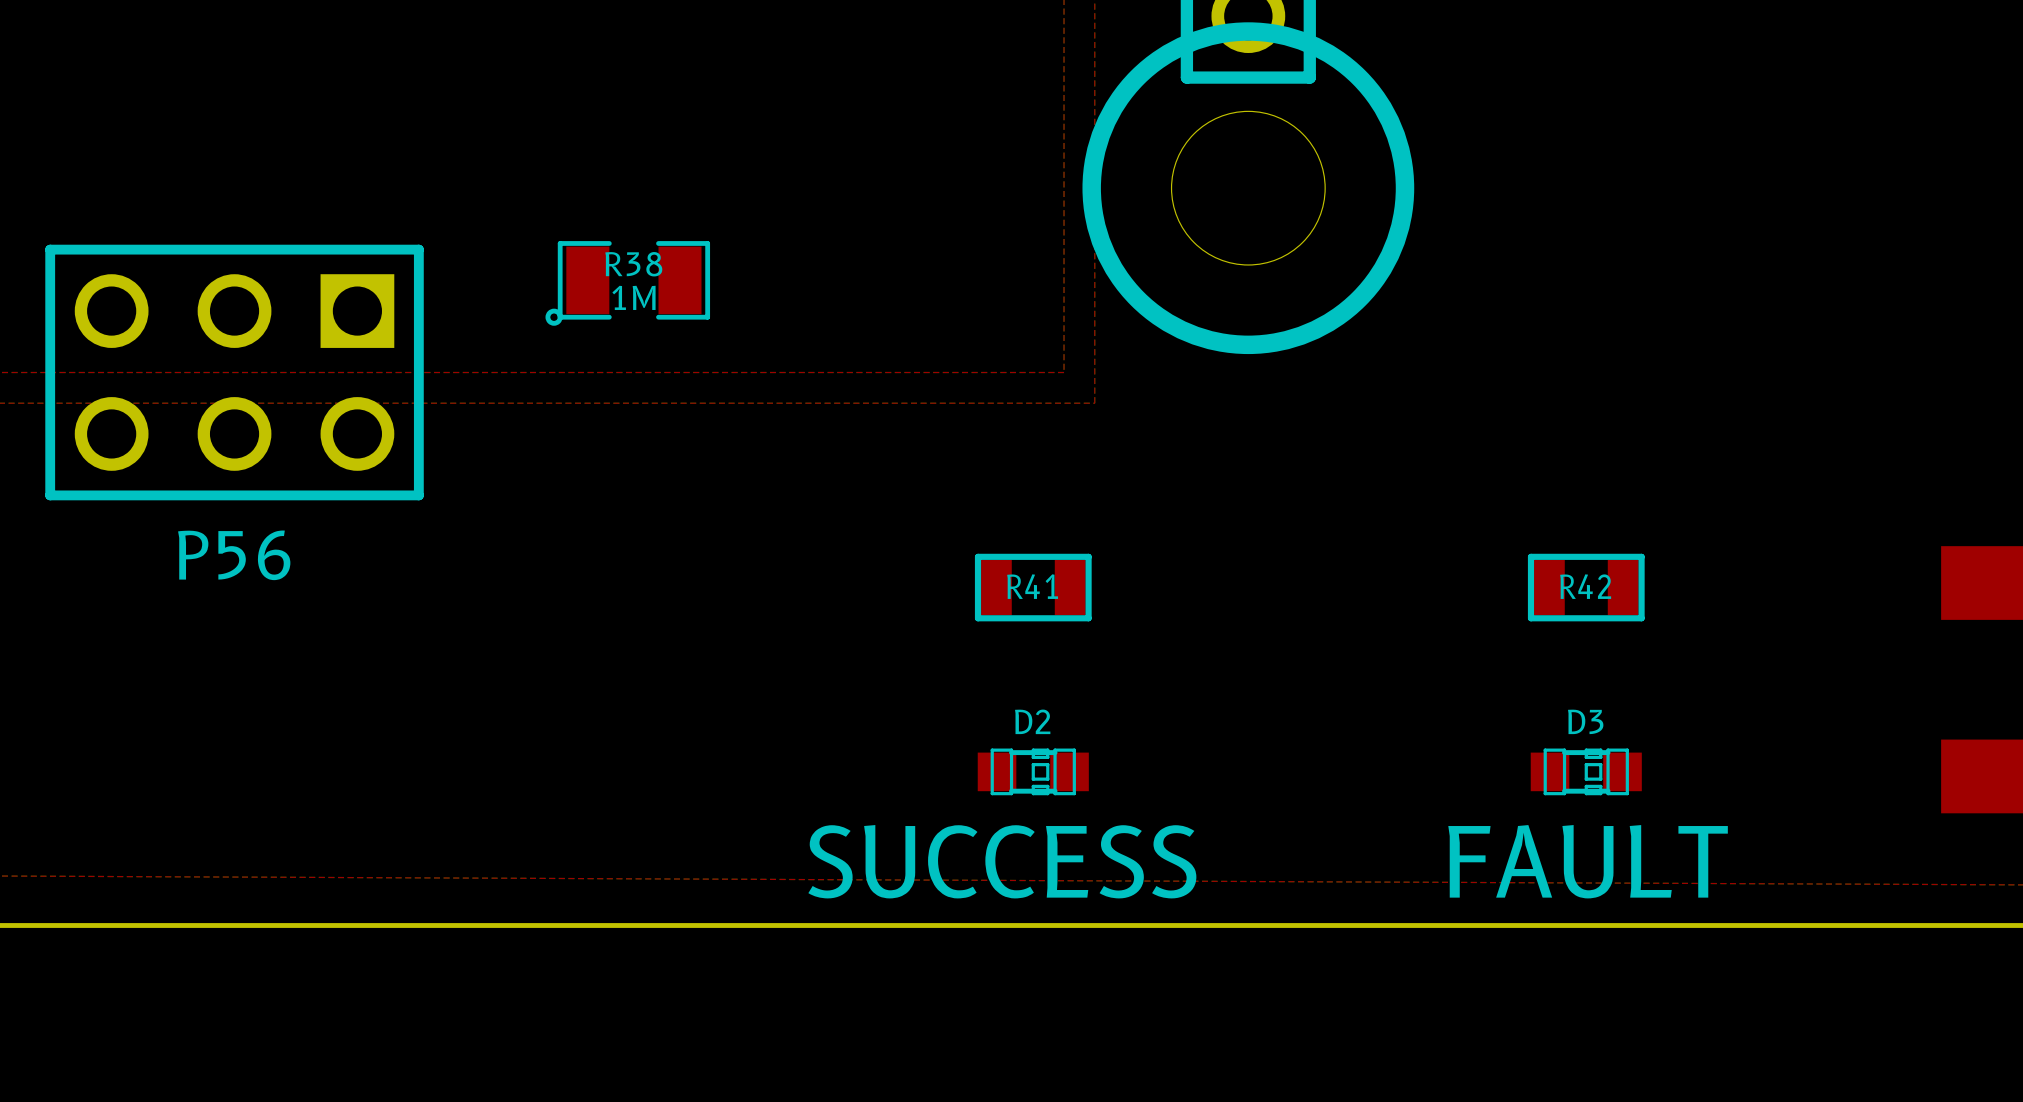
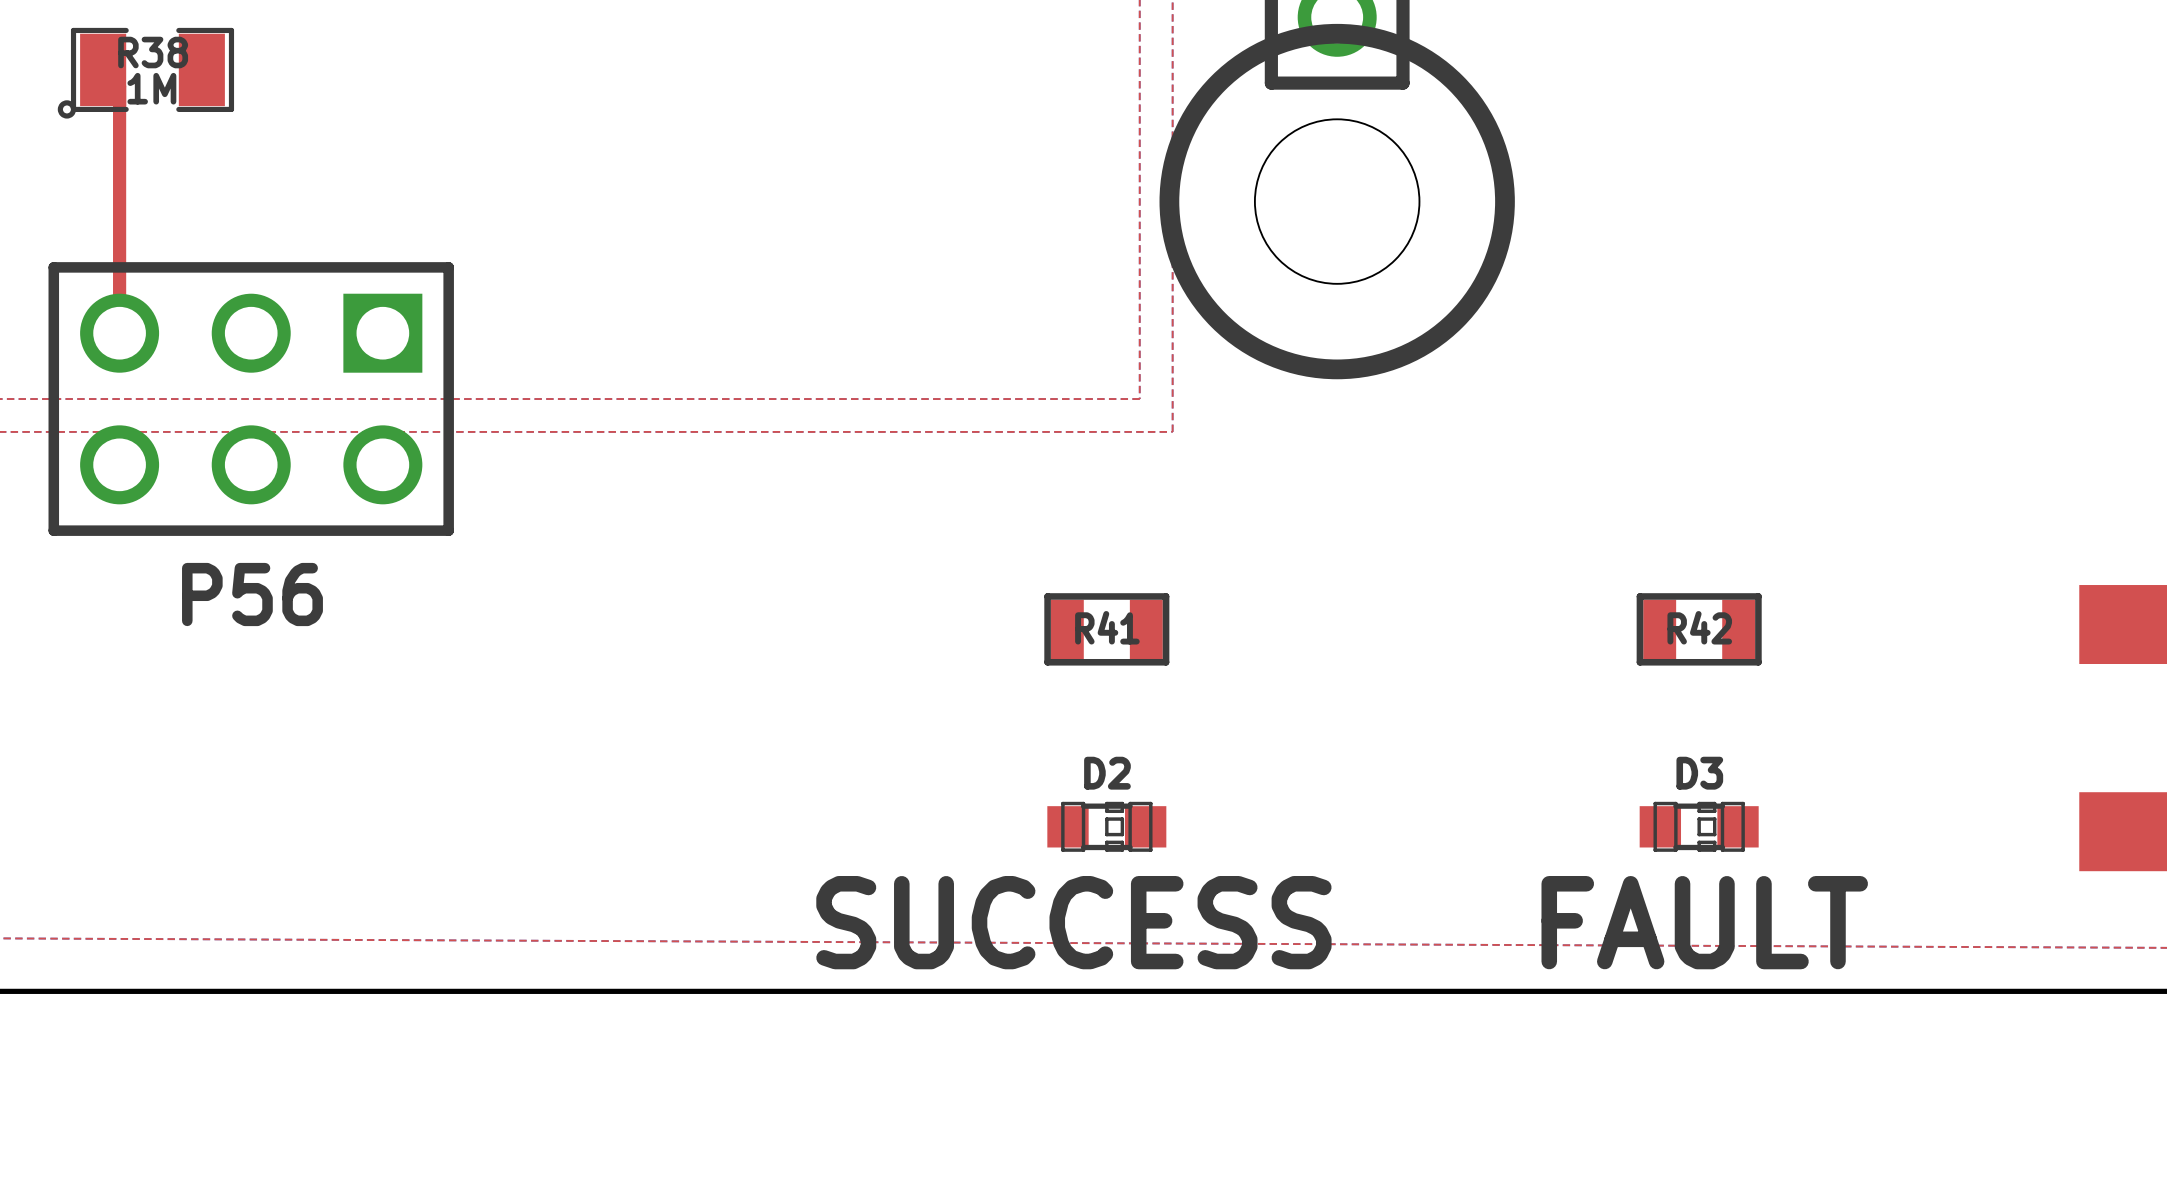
top track: none -> (103, 69) (119, 86) (119, 333)
R38 position: (627, 283) -> (145, 73)

